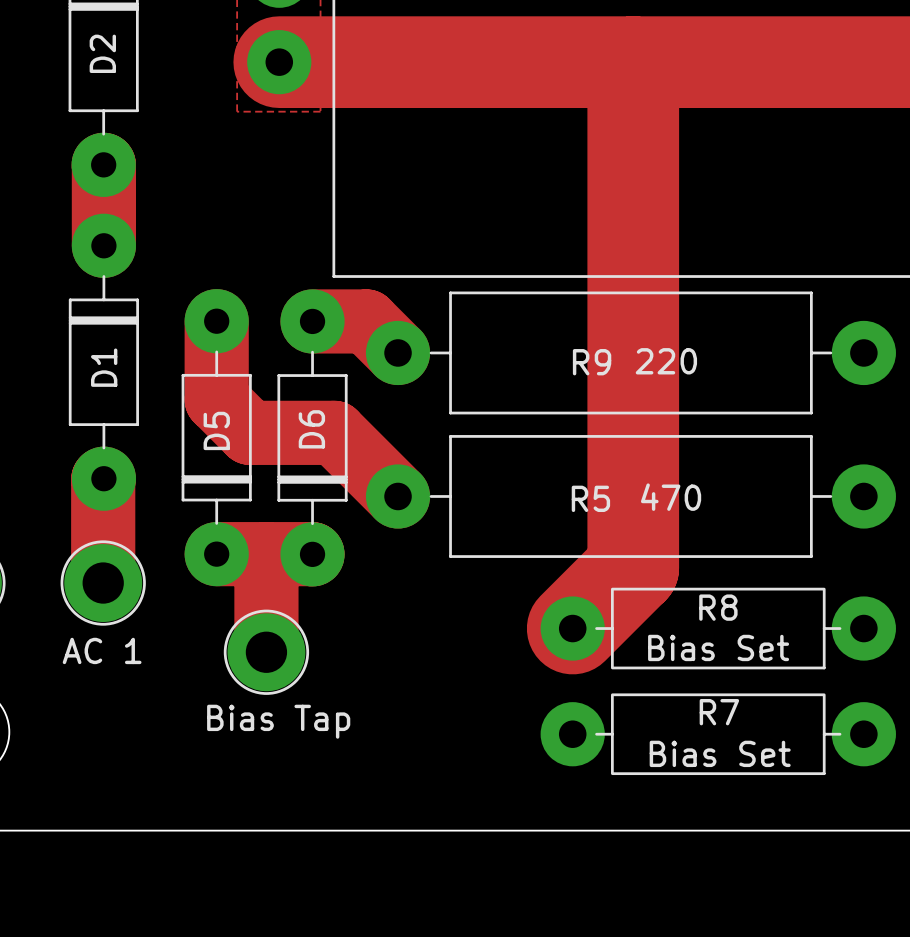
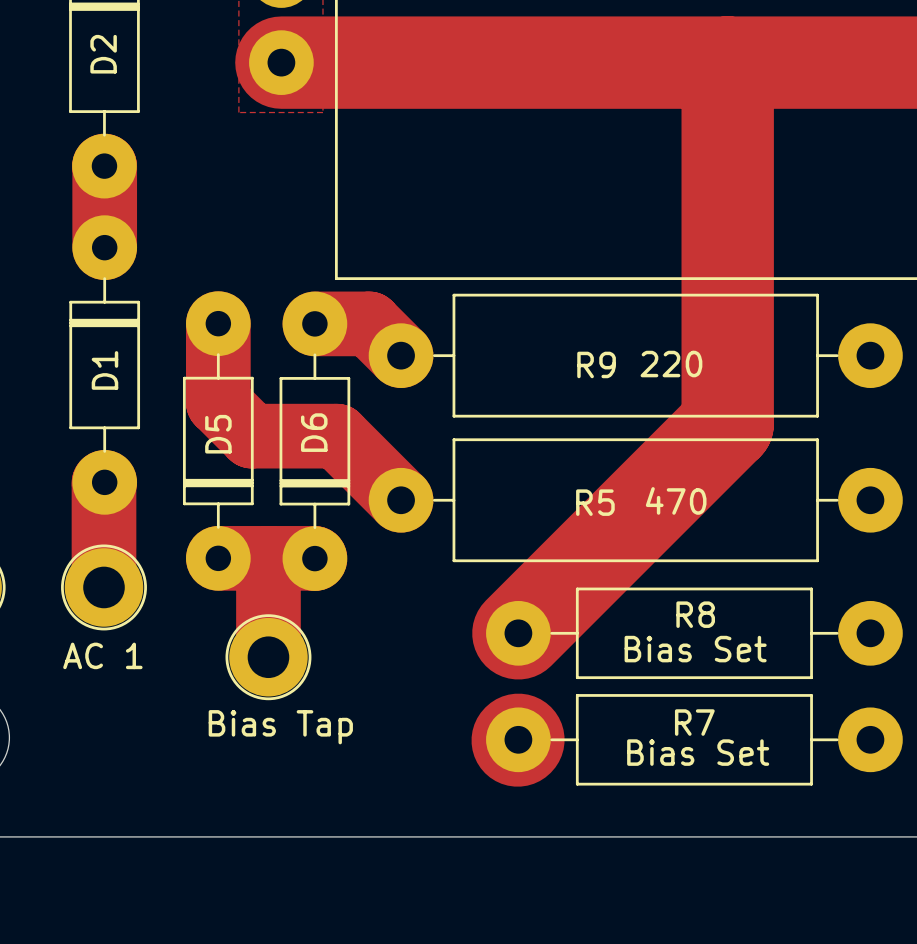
track: (633, 62) (633, 568) (572, 628) -> none
track: none -> (727, 62) (727, 424) (518, 633)
R8 footprint: [540, 587, 896, 670] -> [486, 587, 903, 680]
R7 footprint: [540, 693, 896, 776] -> [486, 694, 903, 786]
track: none -> (518, 739) (517, 740)

